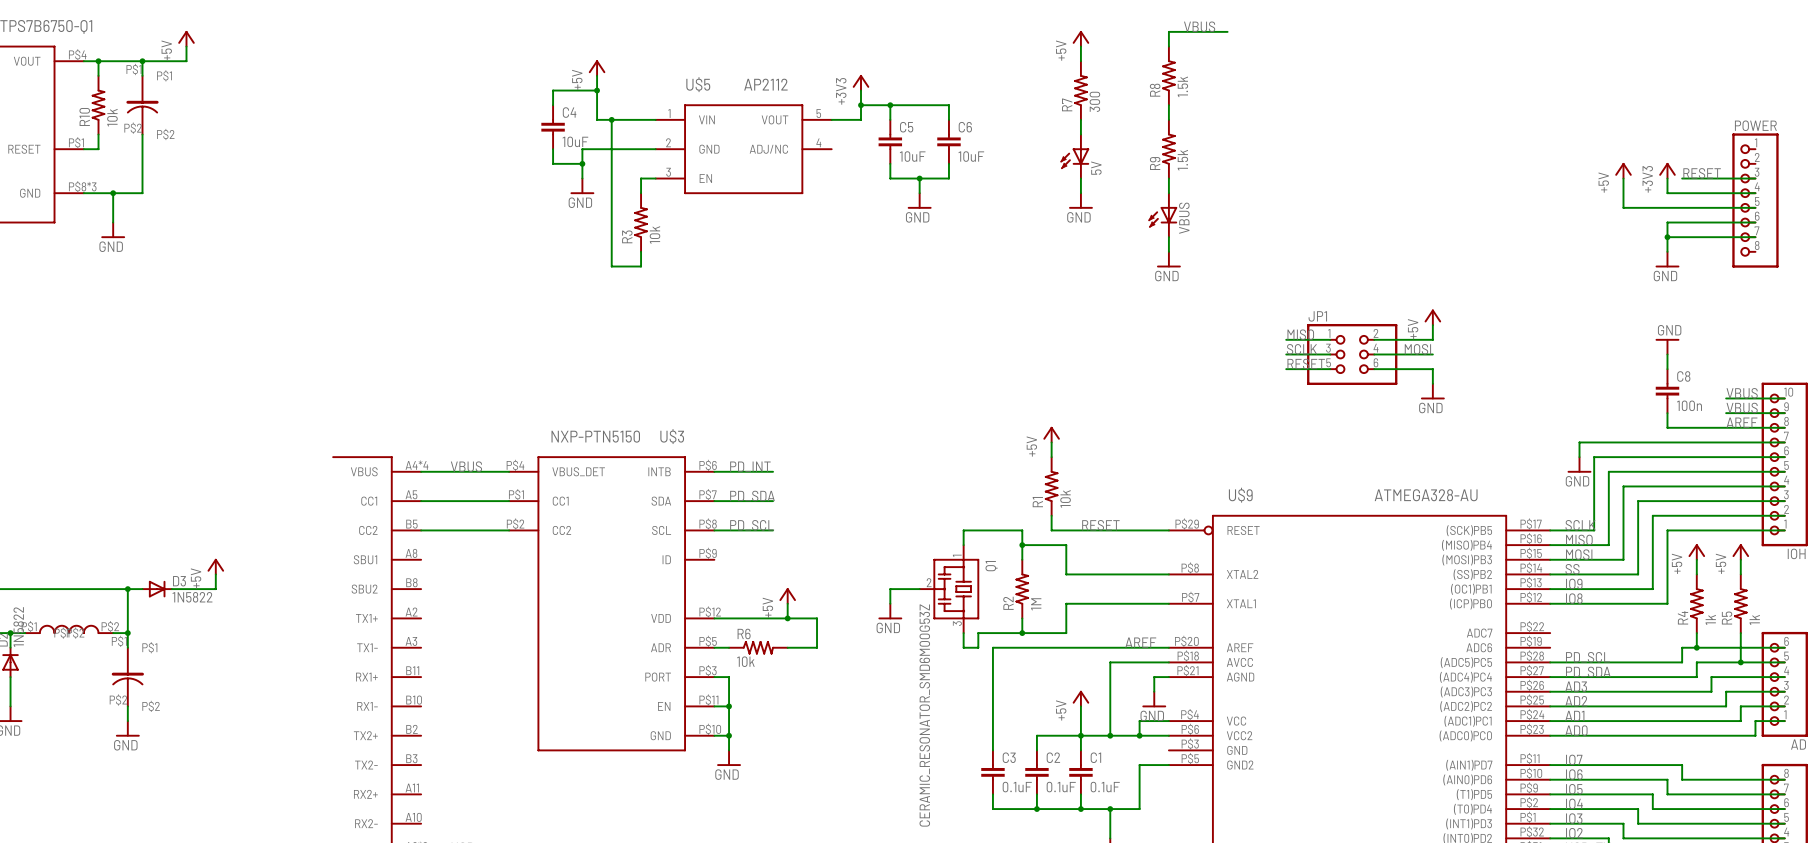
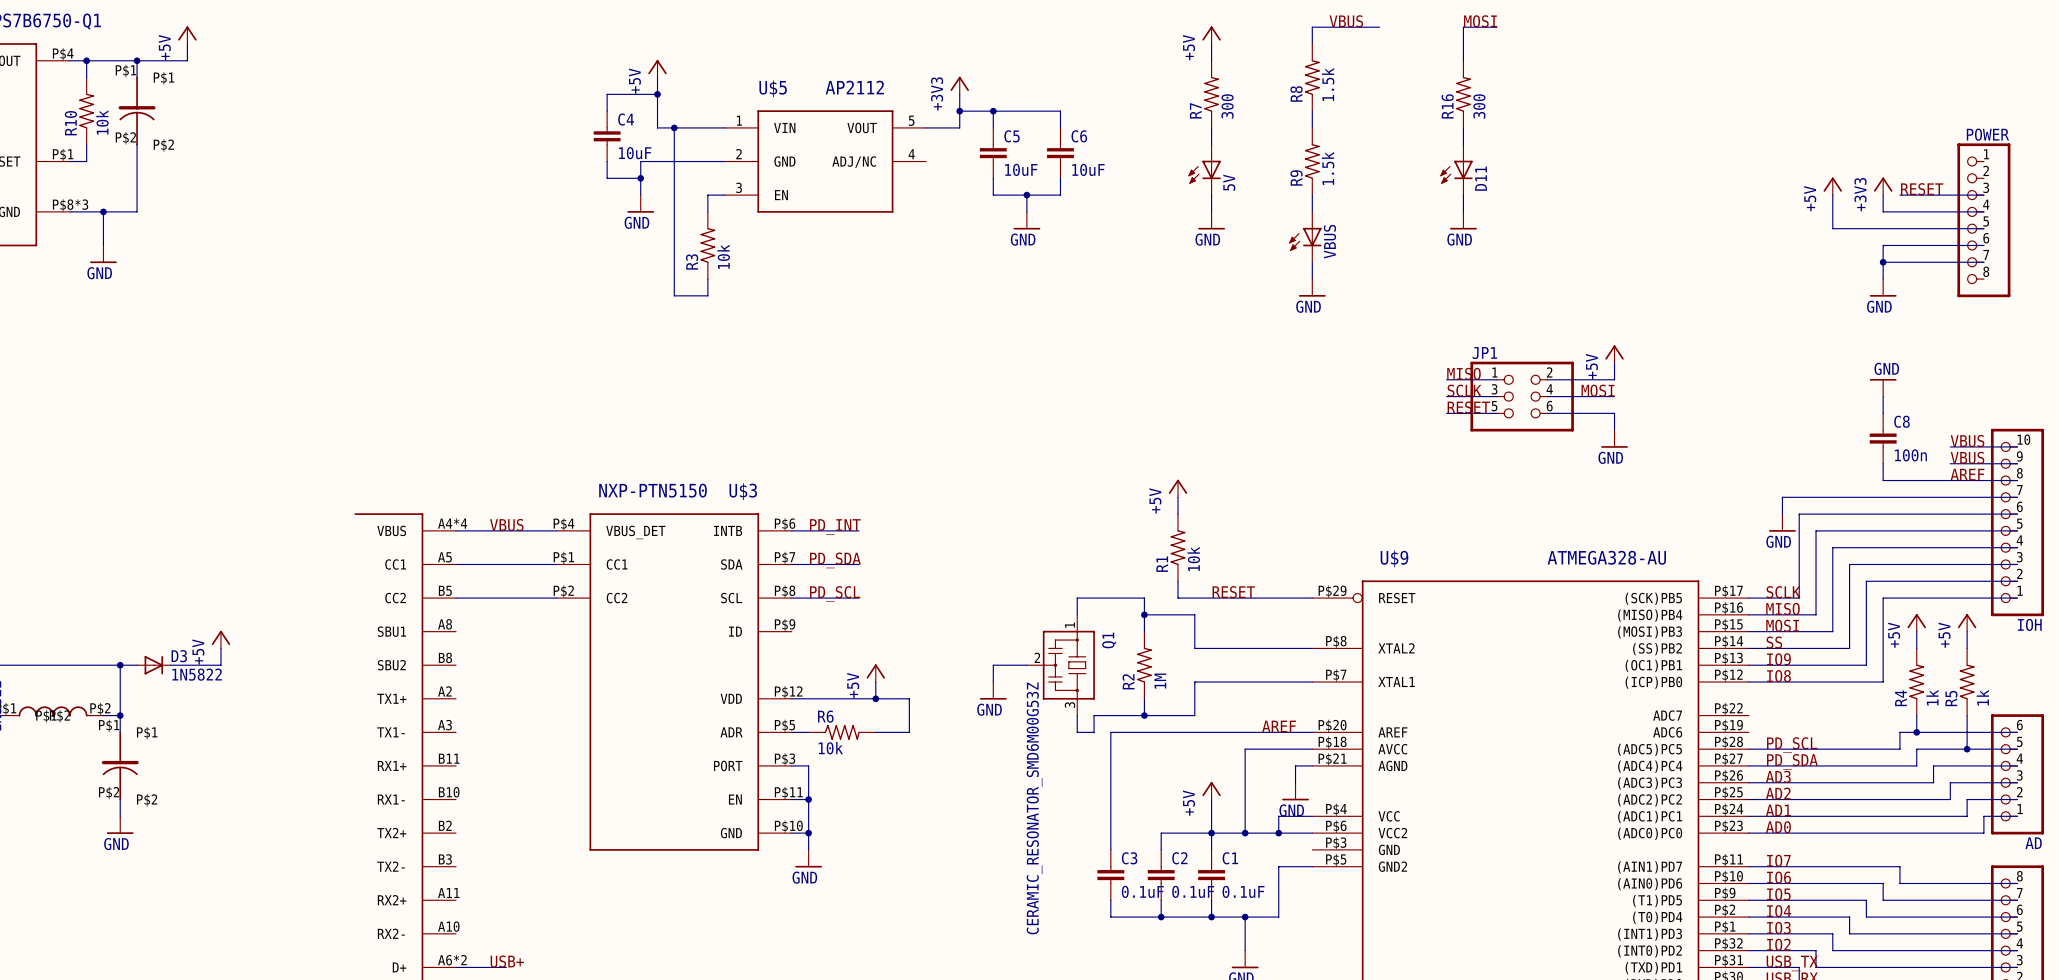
label: none -> MOSI (1480, 21)
wire: none -> (1497, 27) (1463, 27) (1463, 60)
R16: none -> 300 (1463, 94)
wire: none -> (1463, 127) (1463, 144)
D11: none -> (1456, 169)
wire: none -> (1463, 195) (1463, 211)
power symbol: none -> GND (1463, 220)

